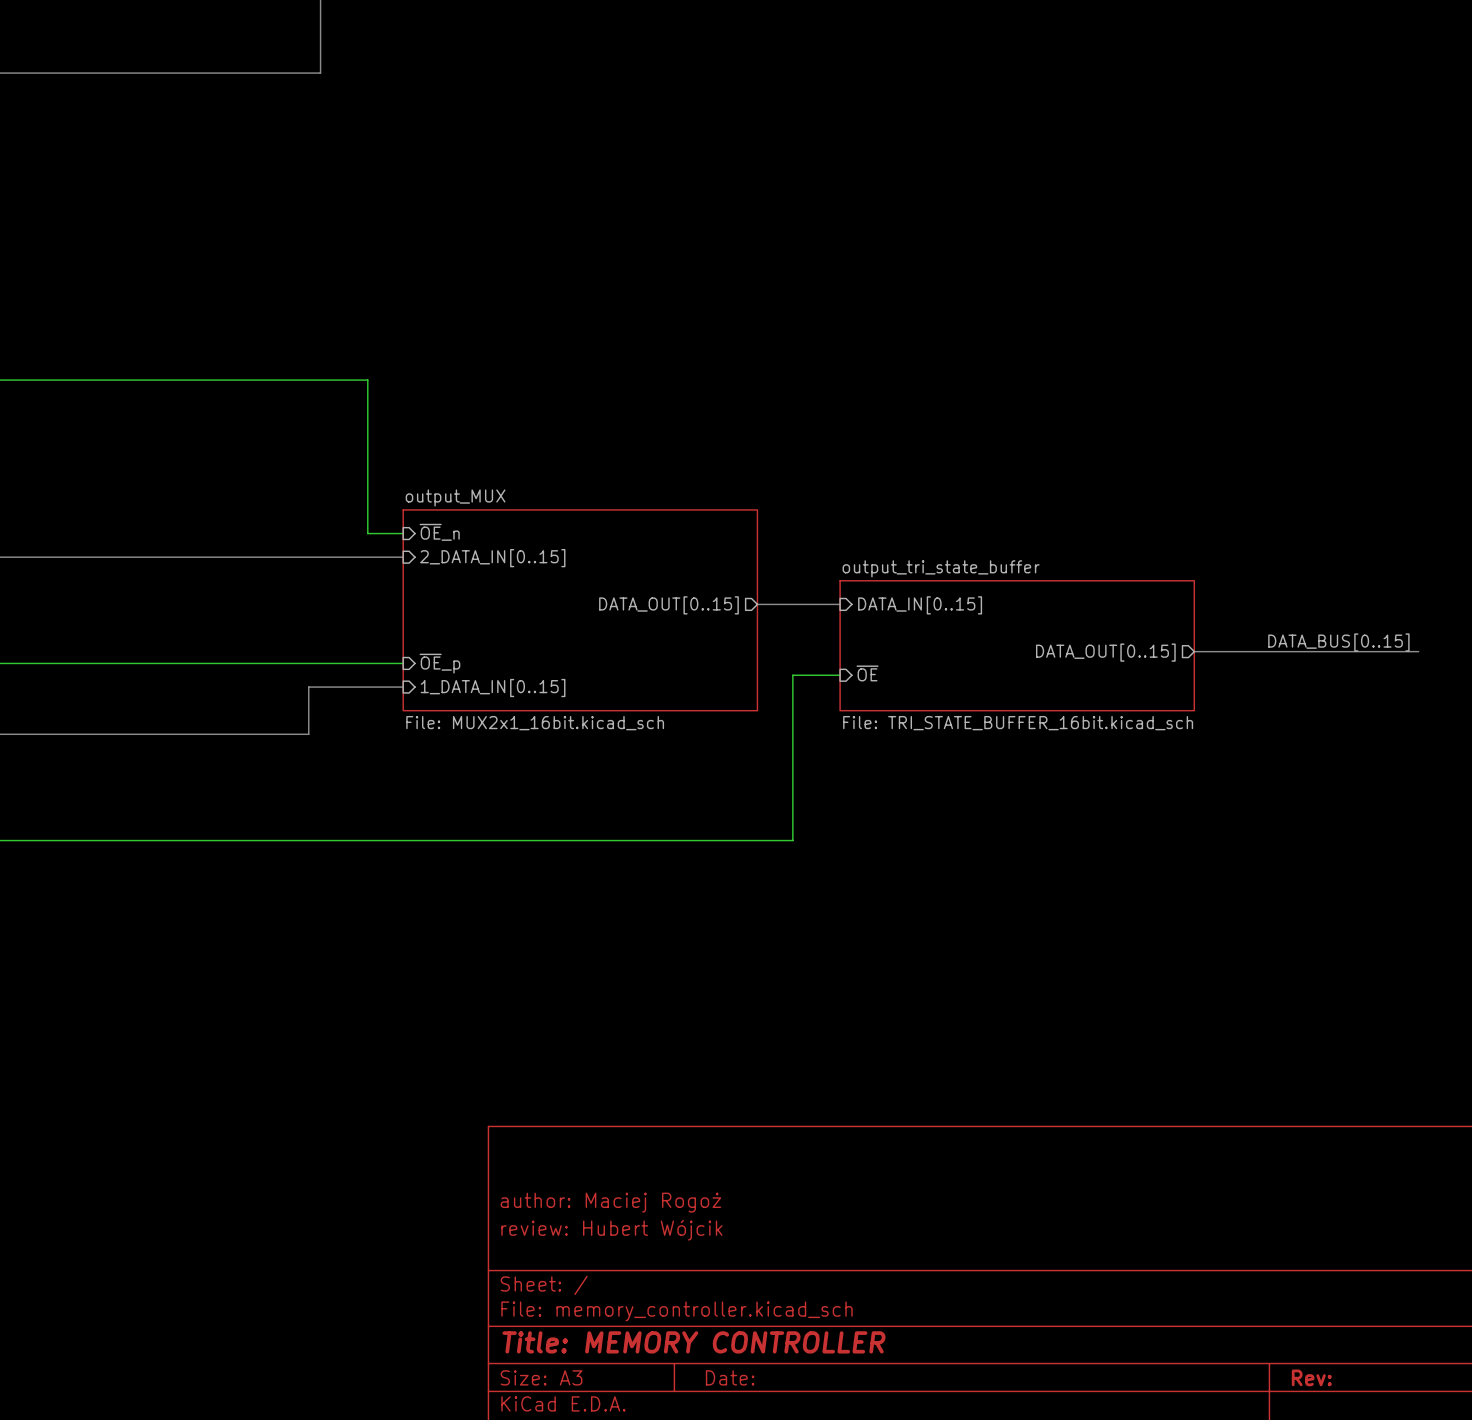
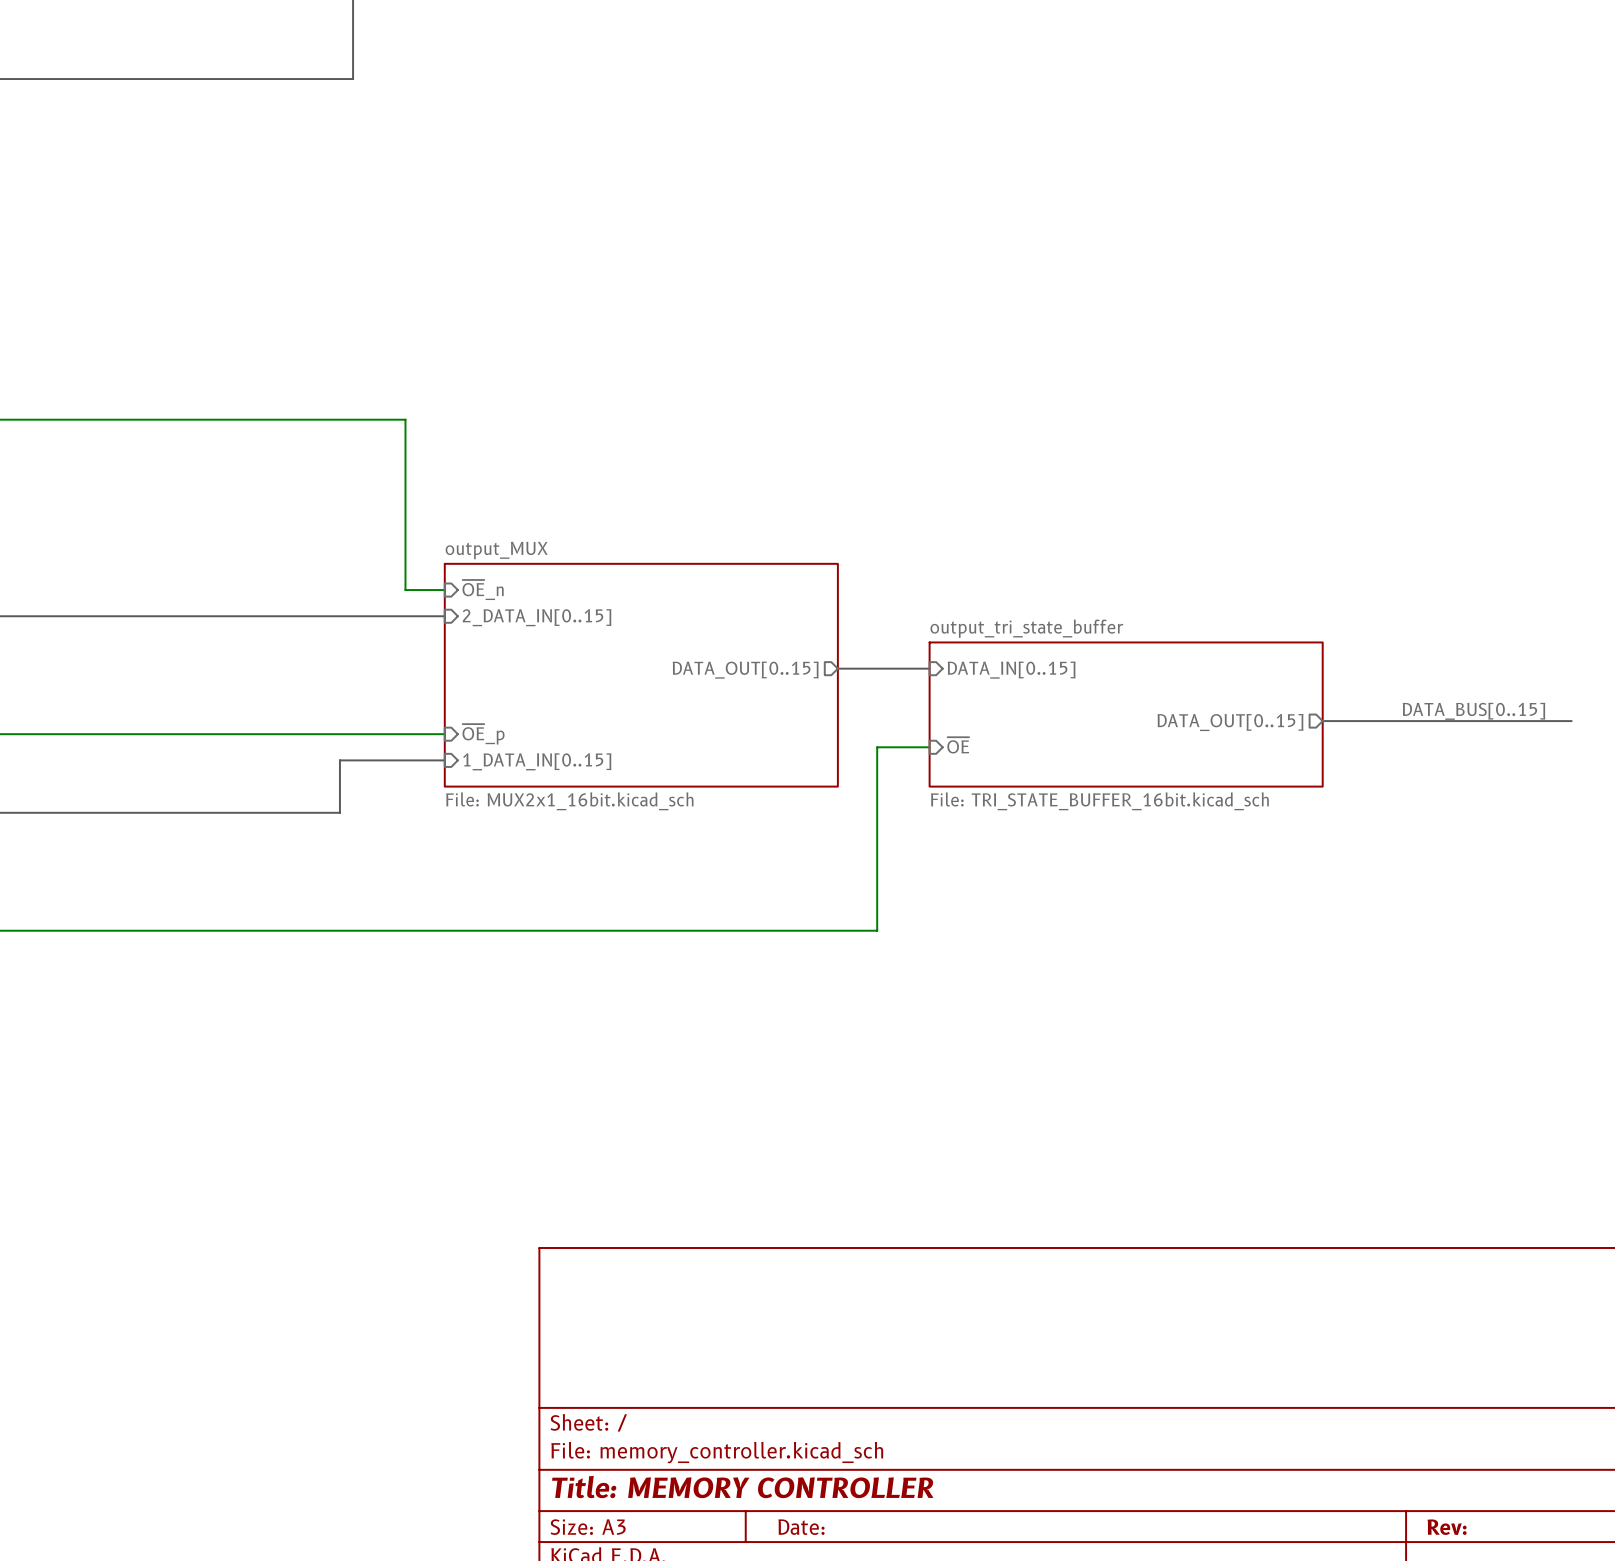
title block: author: Maciej Rogoż (610, 1202) -> none
title block: review: Hubert Wójcik (611, 1230) -> none

